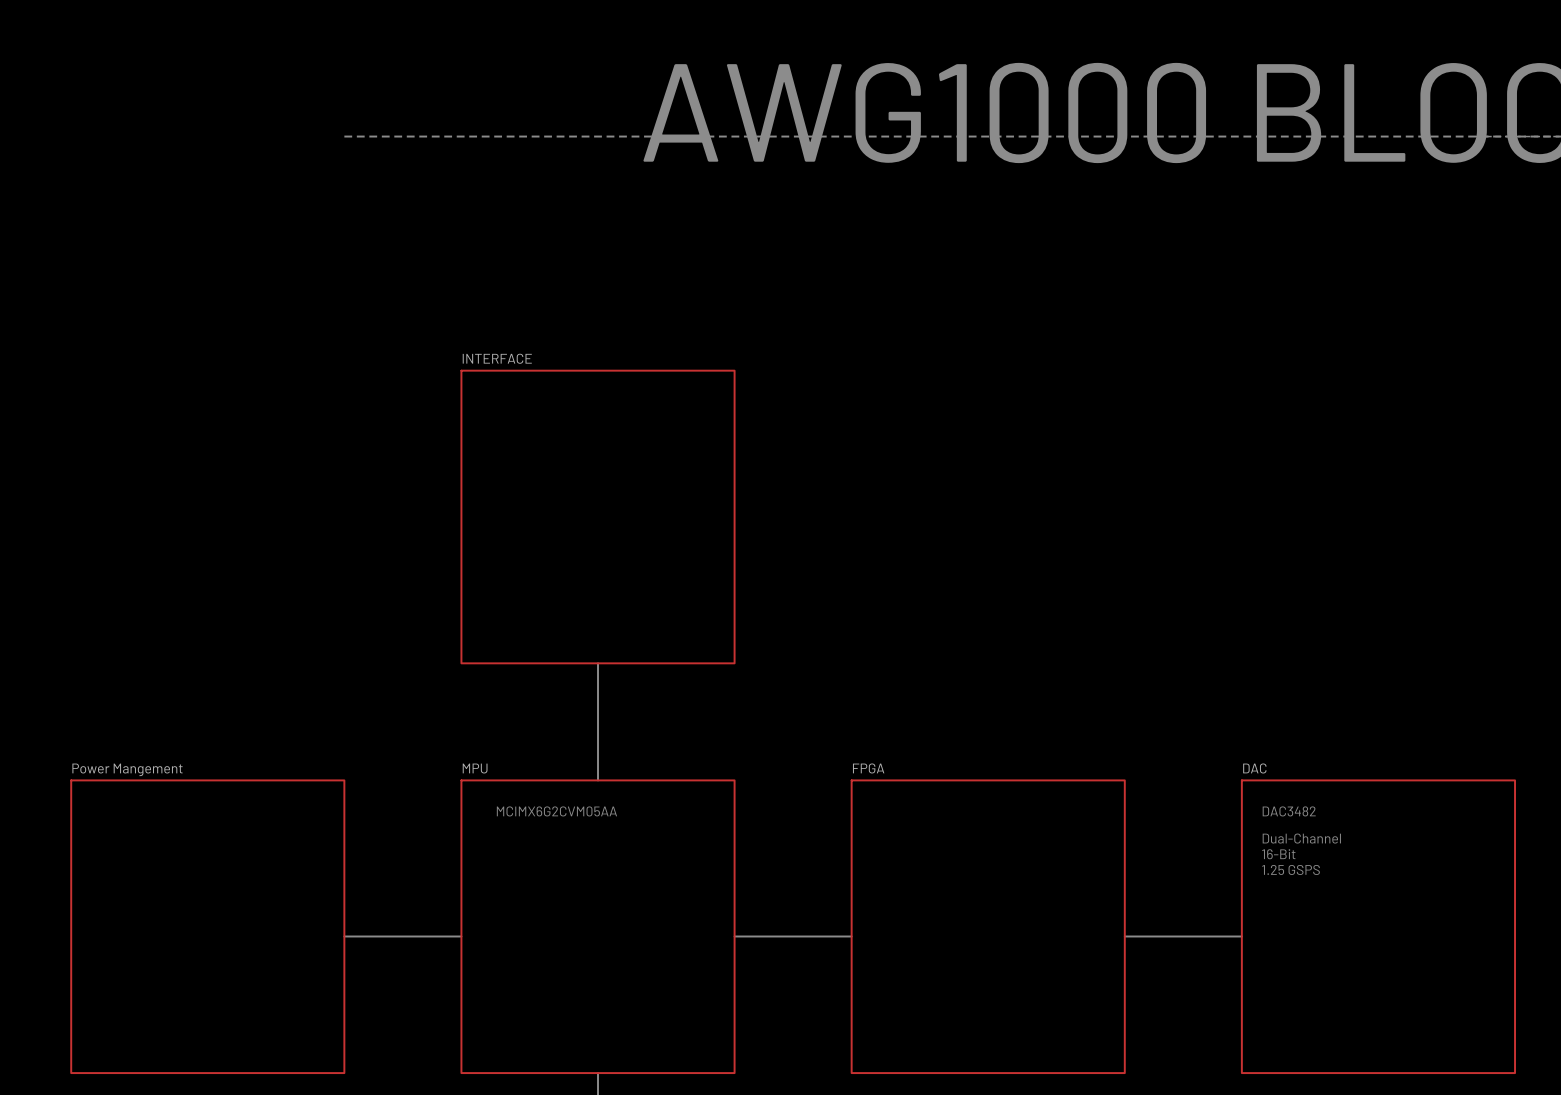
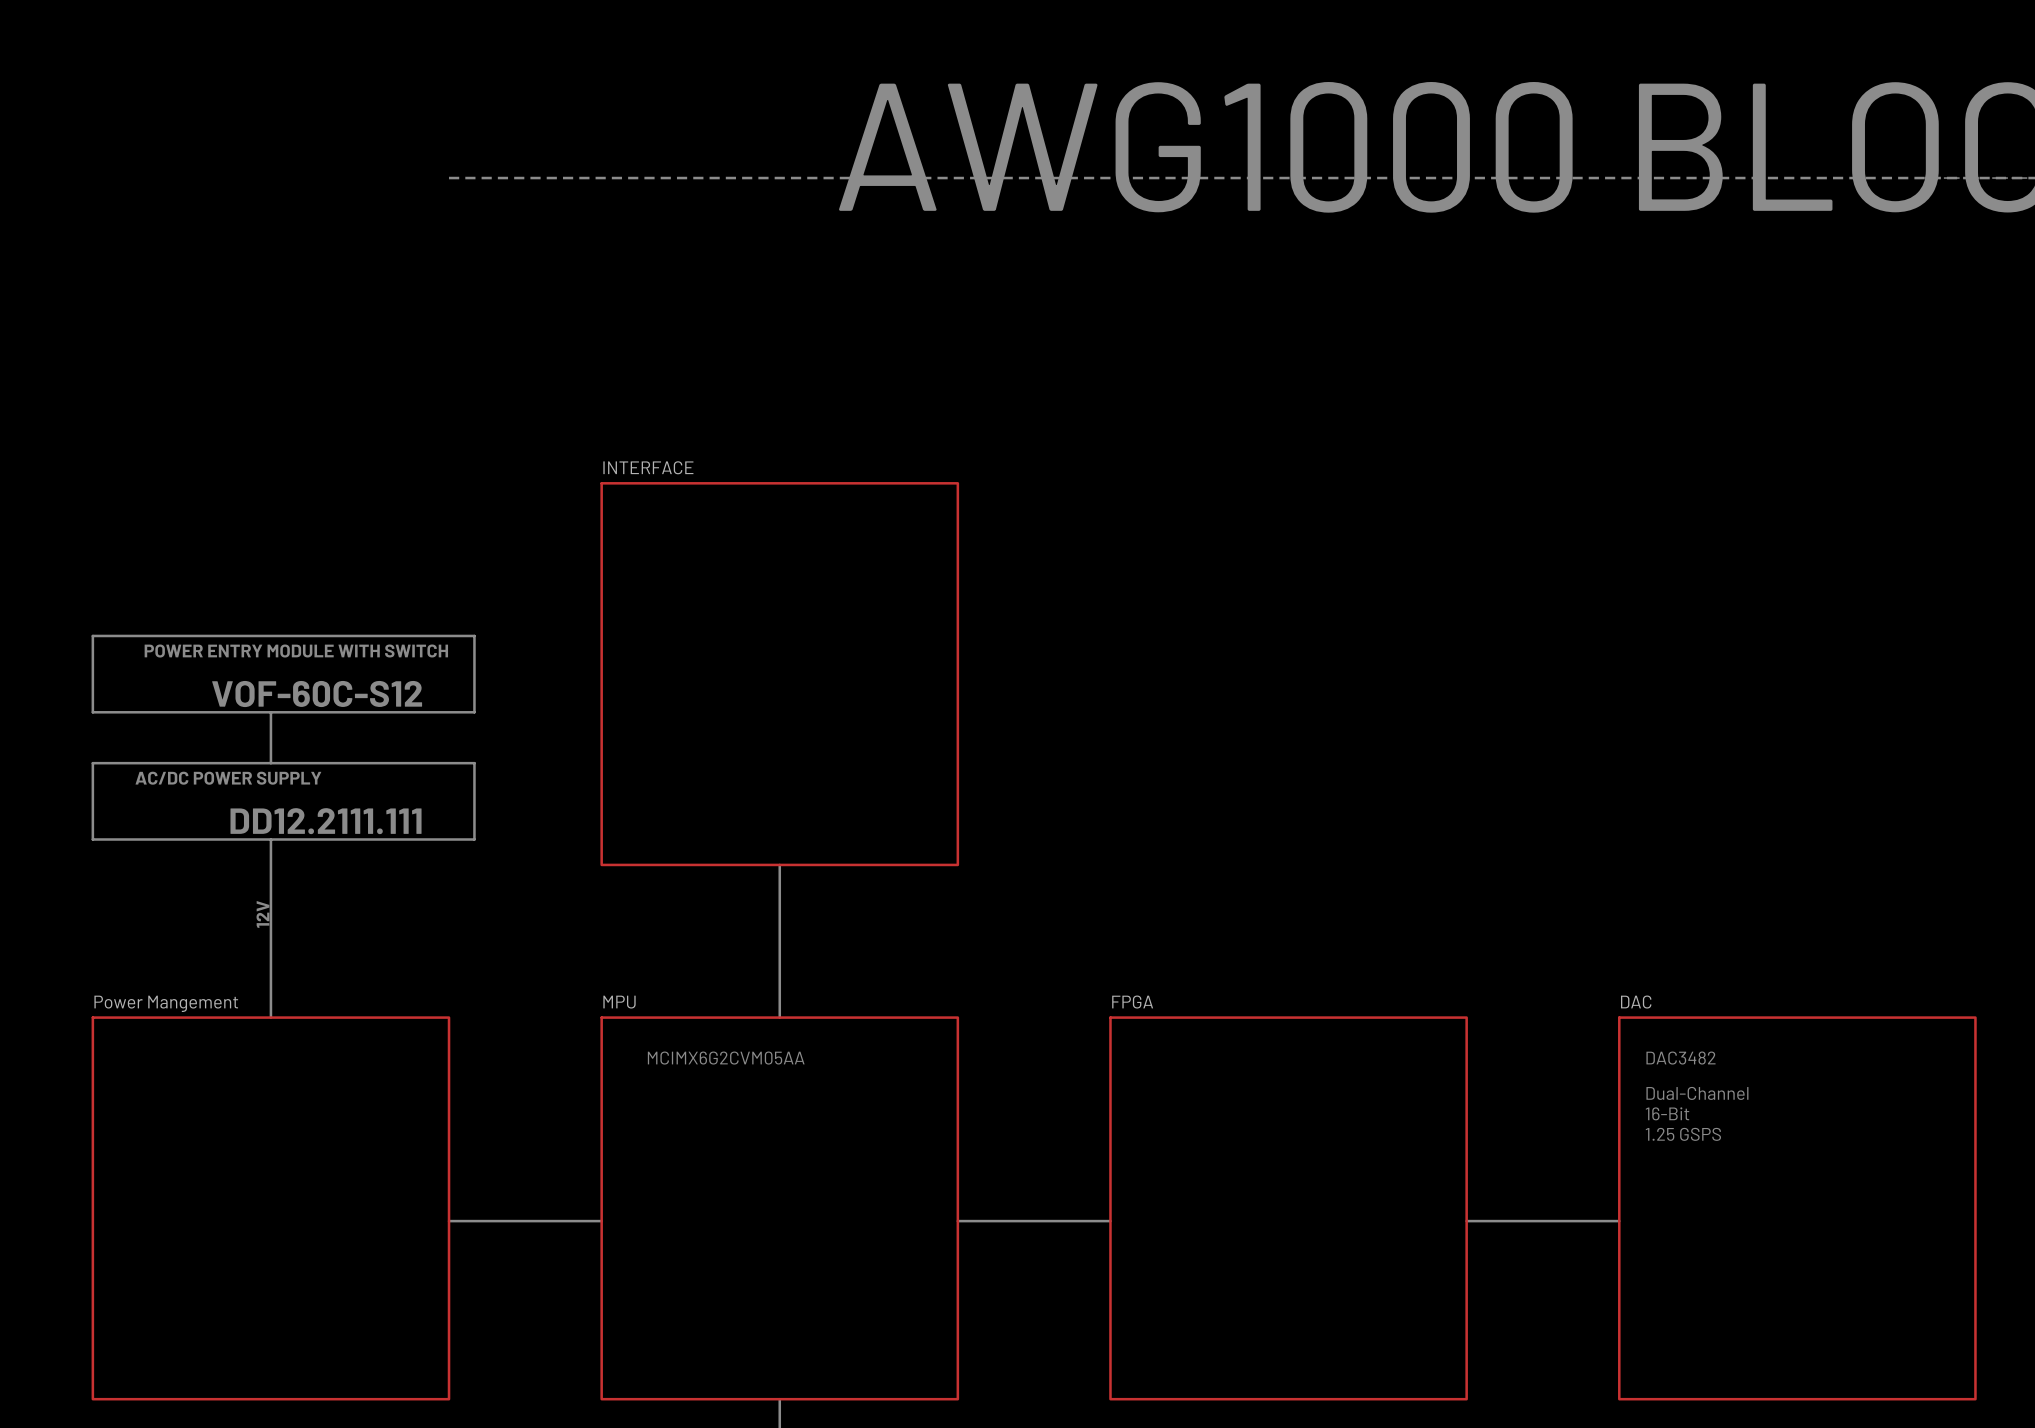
line: none -> (92, 635) (92, 712) (474, 712) (474, 635) (92, 635)
text: none -> POWER ENTRY MODULE WITH SWITCH (296, 651)
text: none -> VOF-60C-S12 (317, 694)
line: none -> (270, 712) (270, 763)
line: none -> (92, 763) (92, 839) (474, 839) (474, 763) (92, 763)
text: none -> AC/DC POWER SUPPLY (228, 778)
text: none -> DD12.2111.111 (326, 821)
line: none -> (270, 839) (270, 1017)
text: none -> 12V (262, 914)

